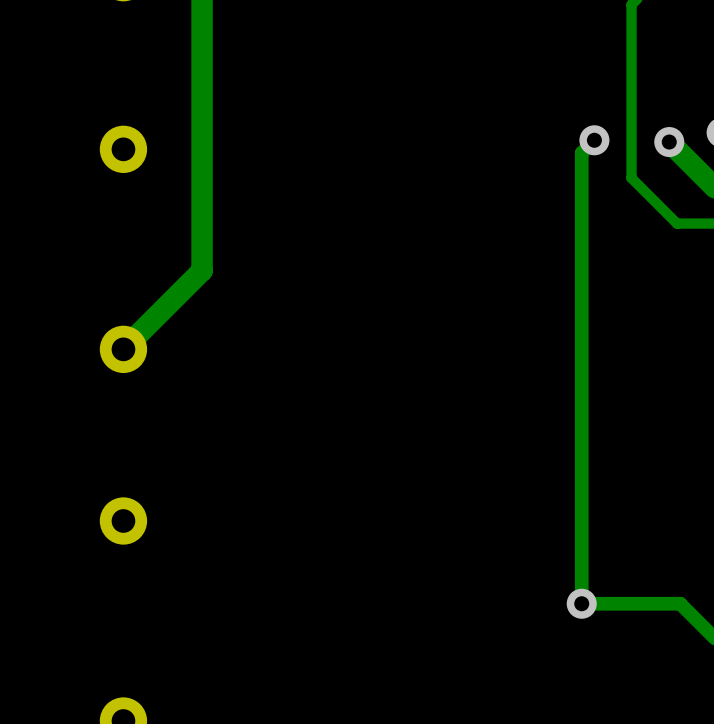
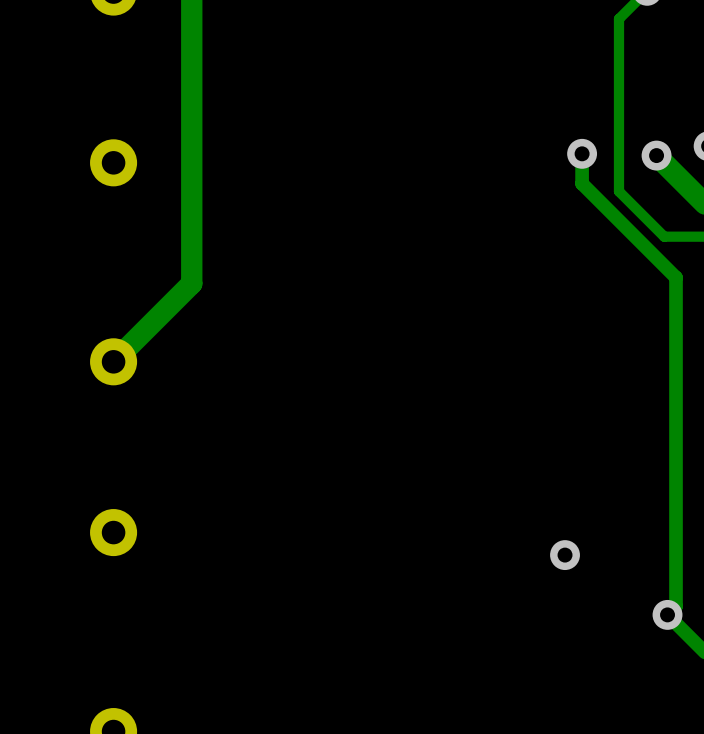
track: (594, 140) (581, 152) (581, 603) (680, 603) -> (582, 153) (582, 183) (676, 277) (676, 606) (667, 614)
via: none -> (565, 555)
via: (581, 603) -> none
via: none -> (667, 614)

